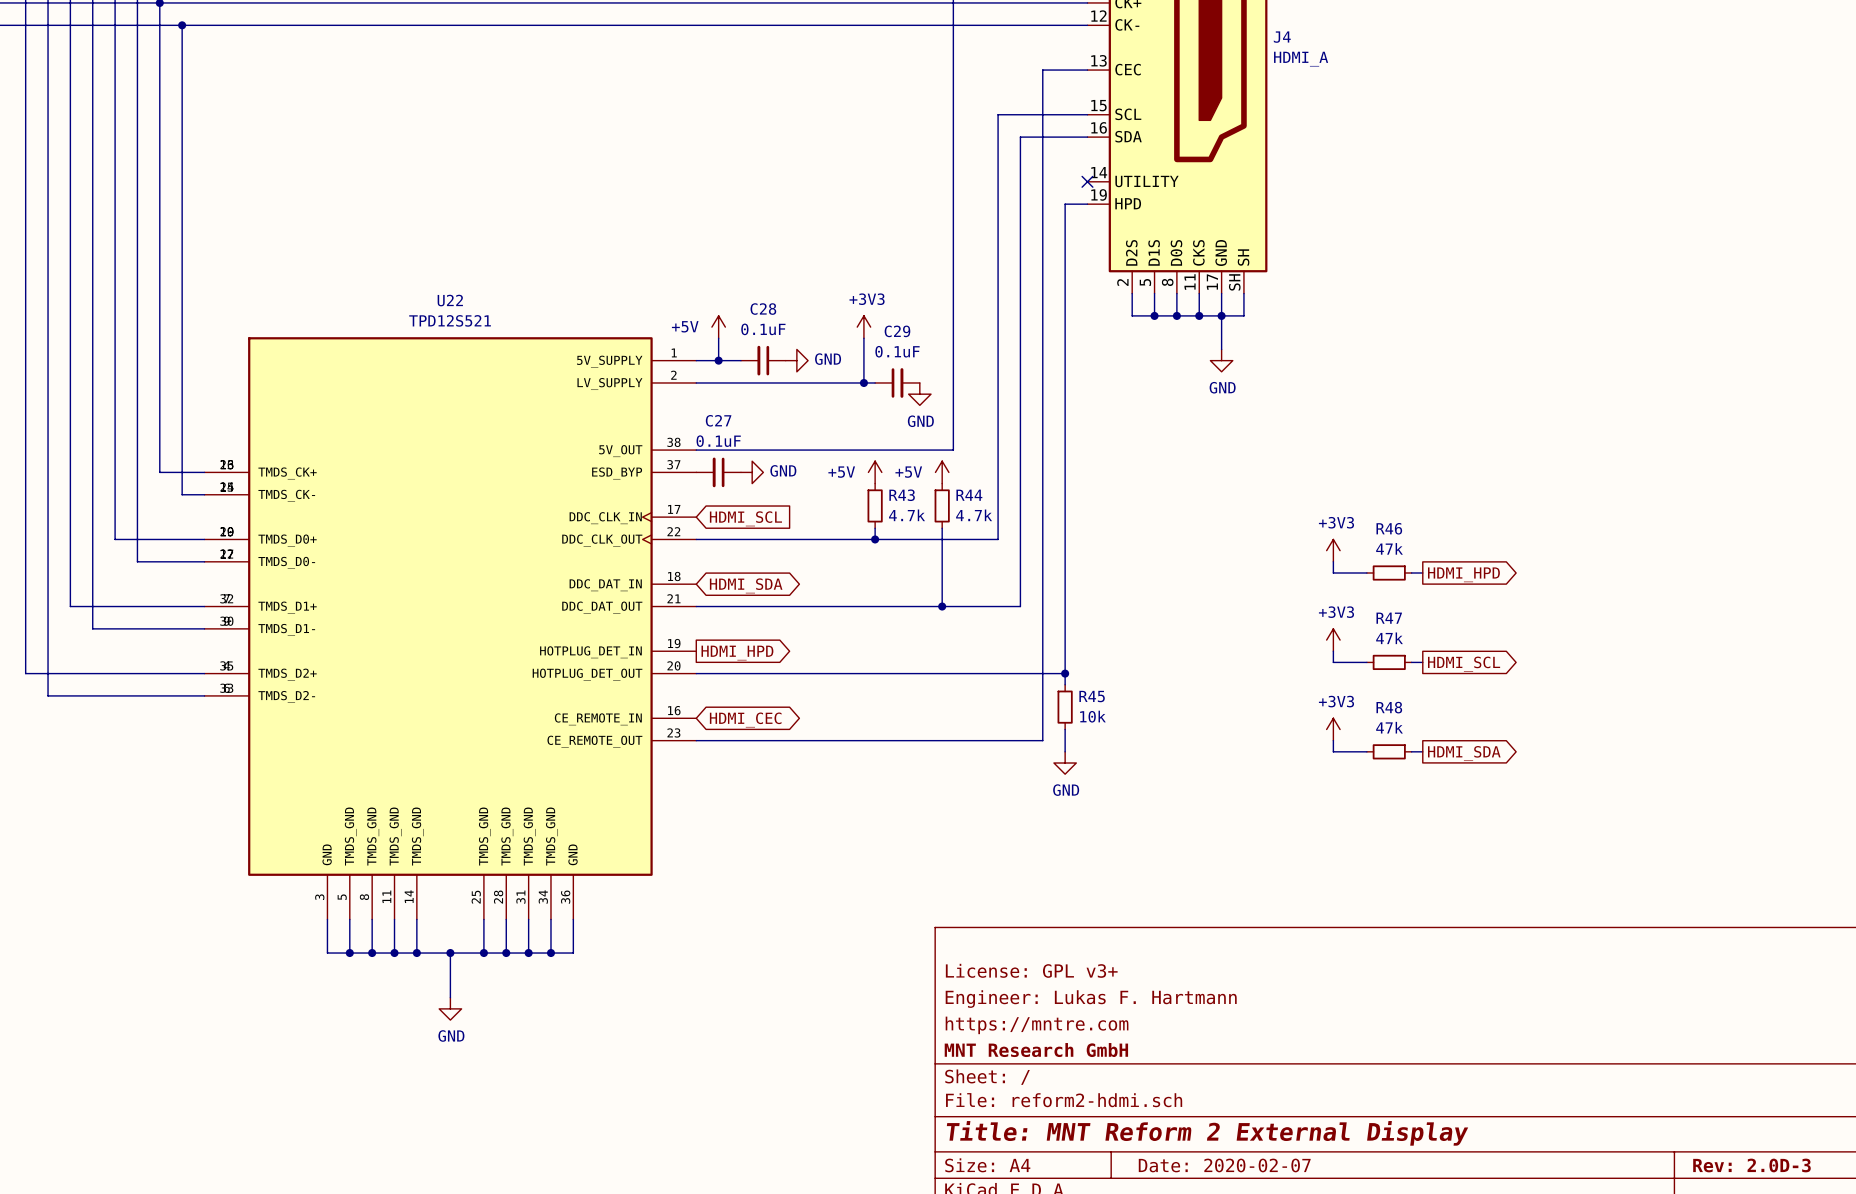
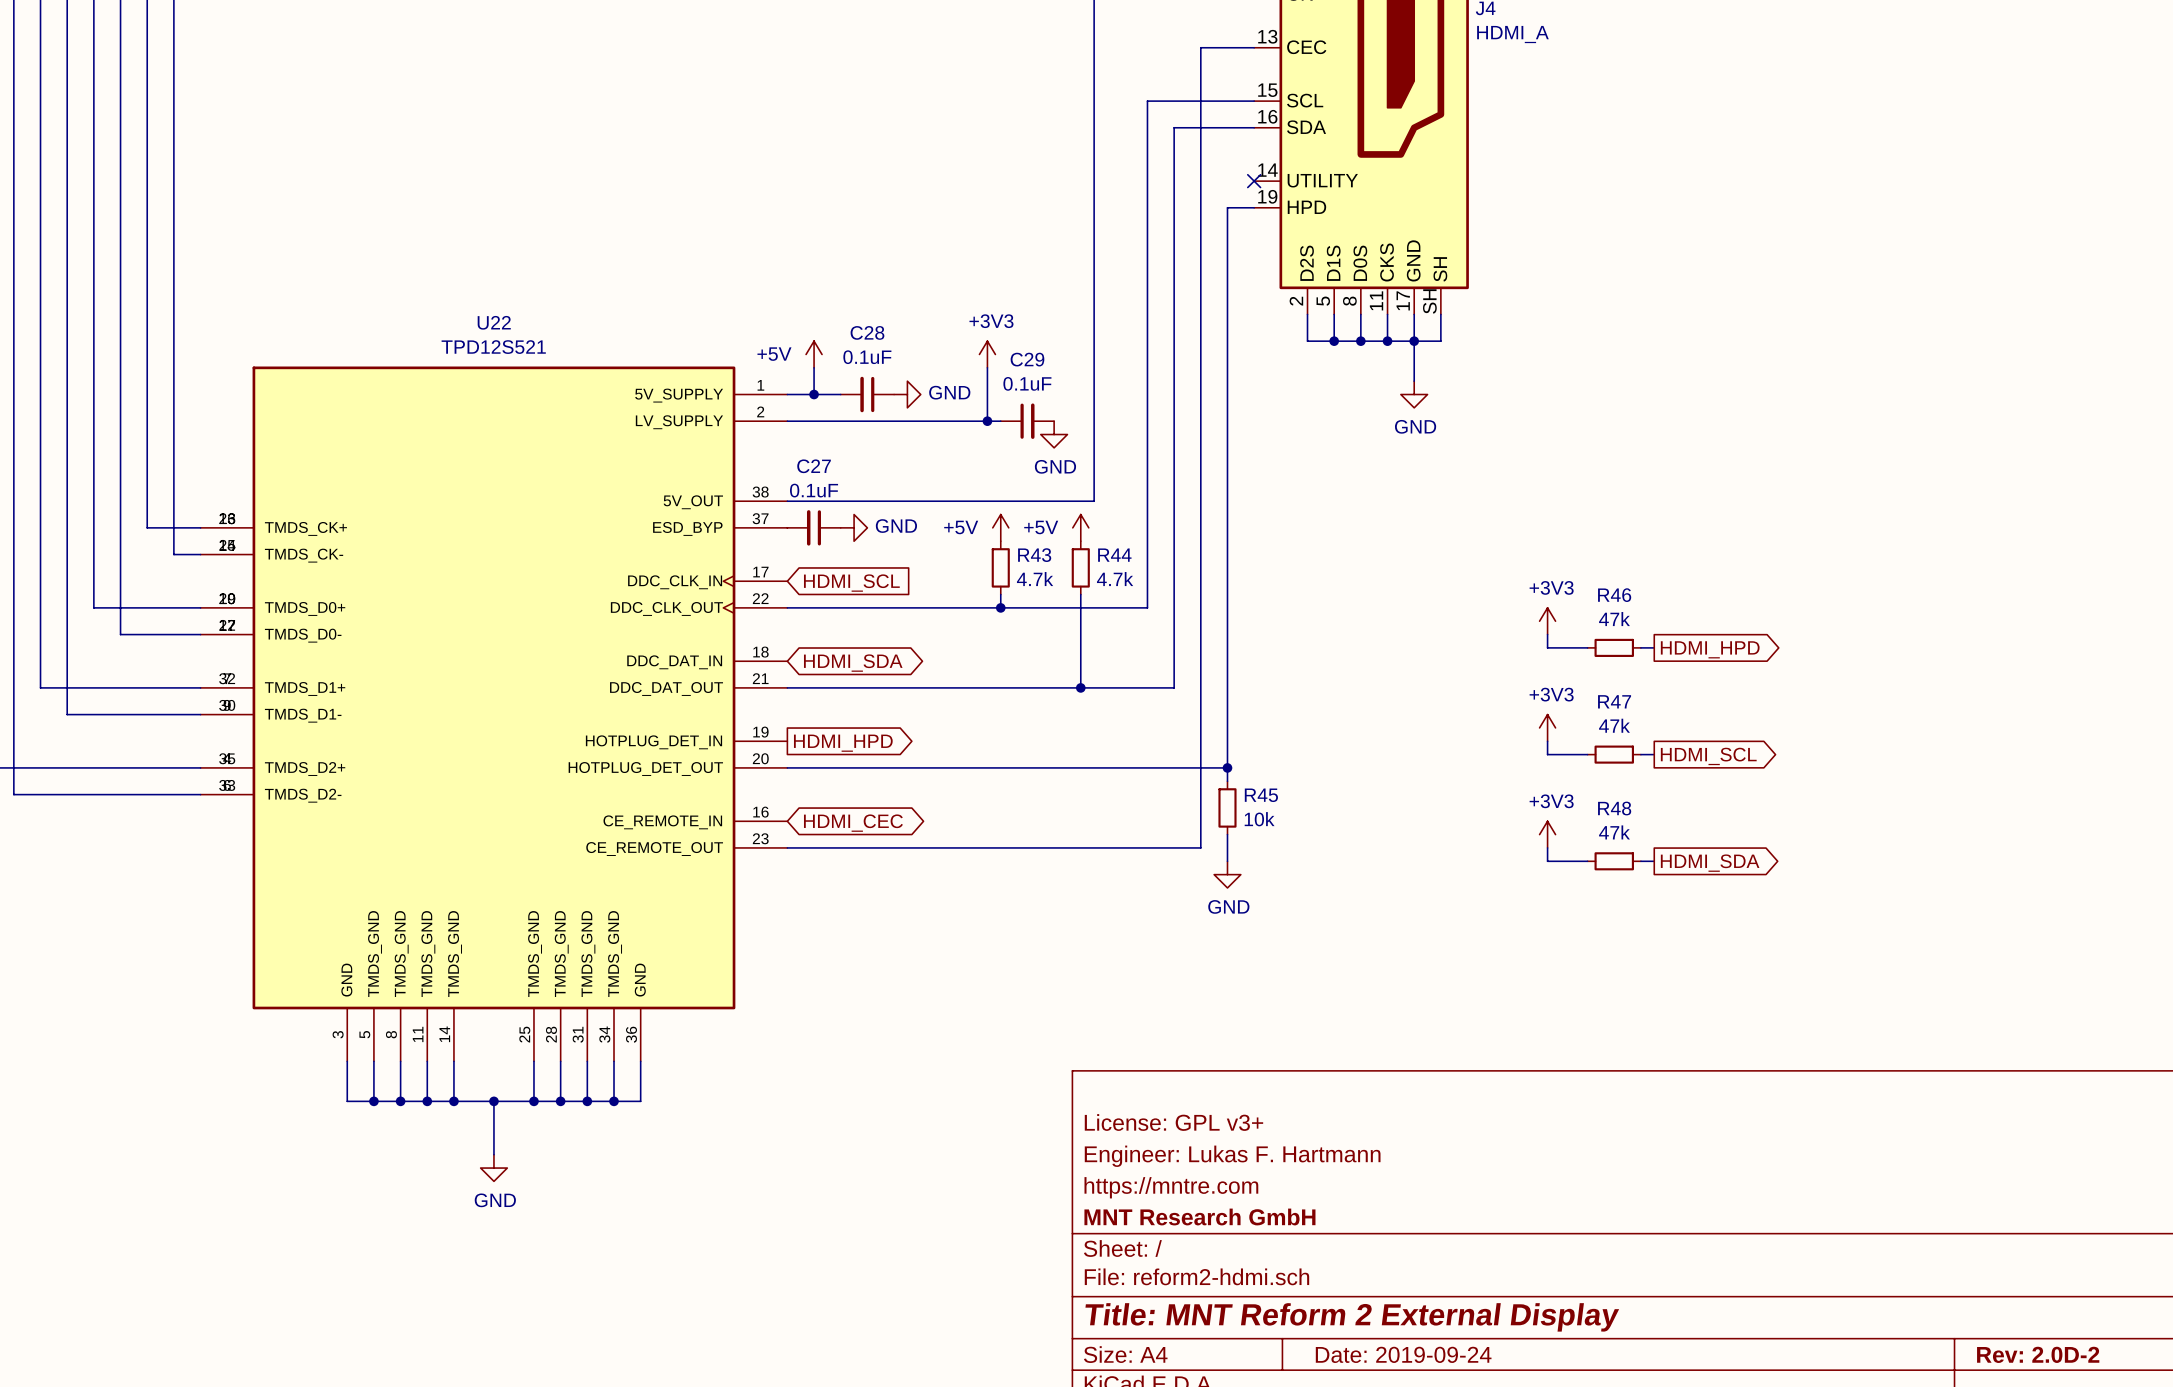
title block: Date: 2020-02-07 (1224, 1165) -> Date: 2019-09-24 (1403, 1354)
title block: Rev: 2.0D-3 (1751, 1165) -> Rev: 2.0D-2 (2038, 1354)

